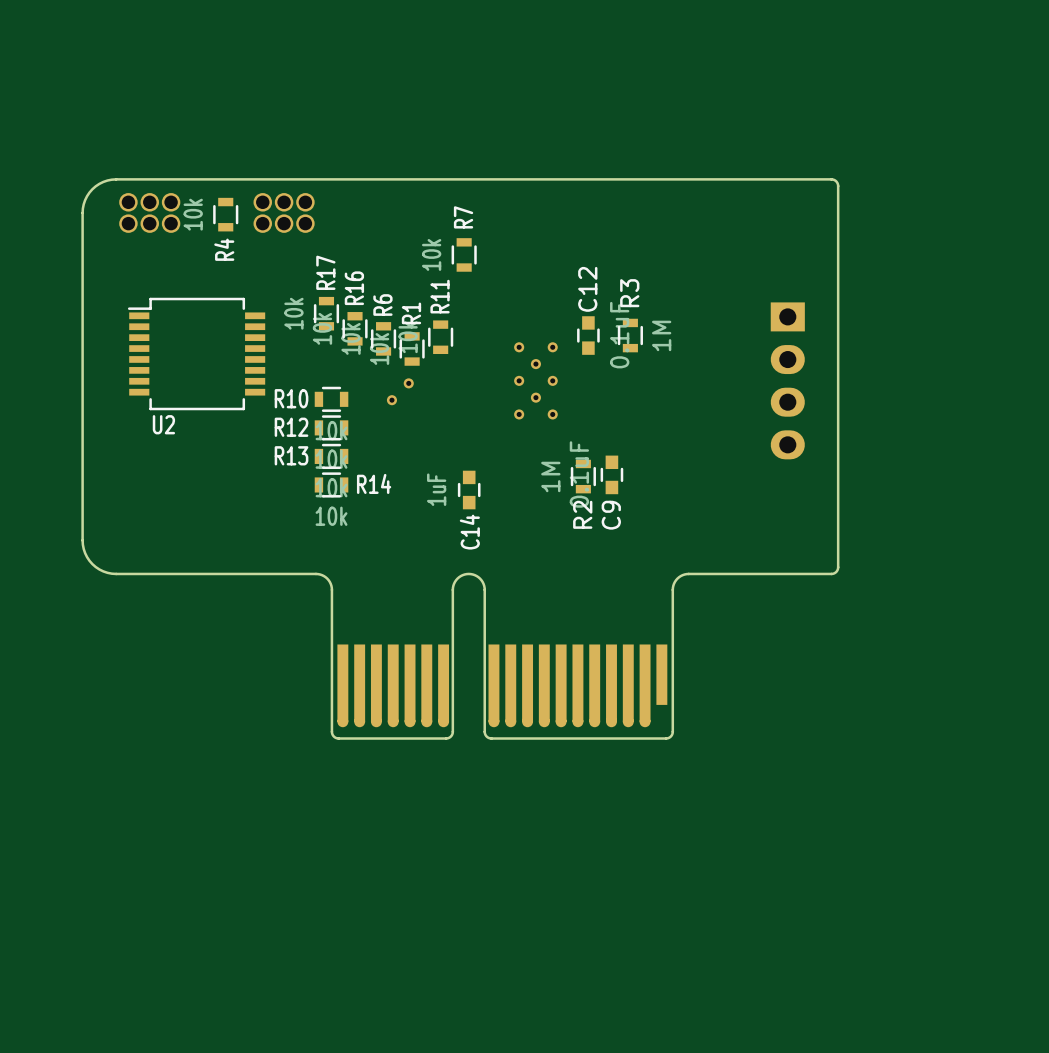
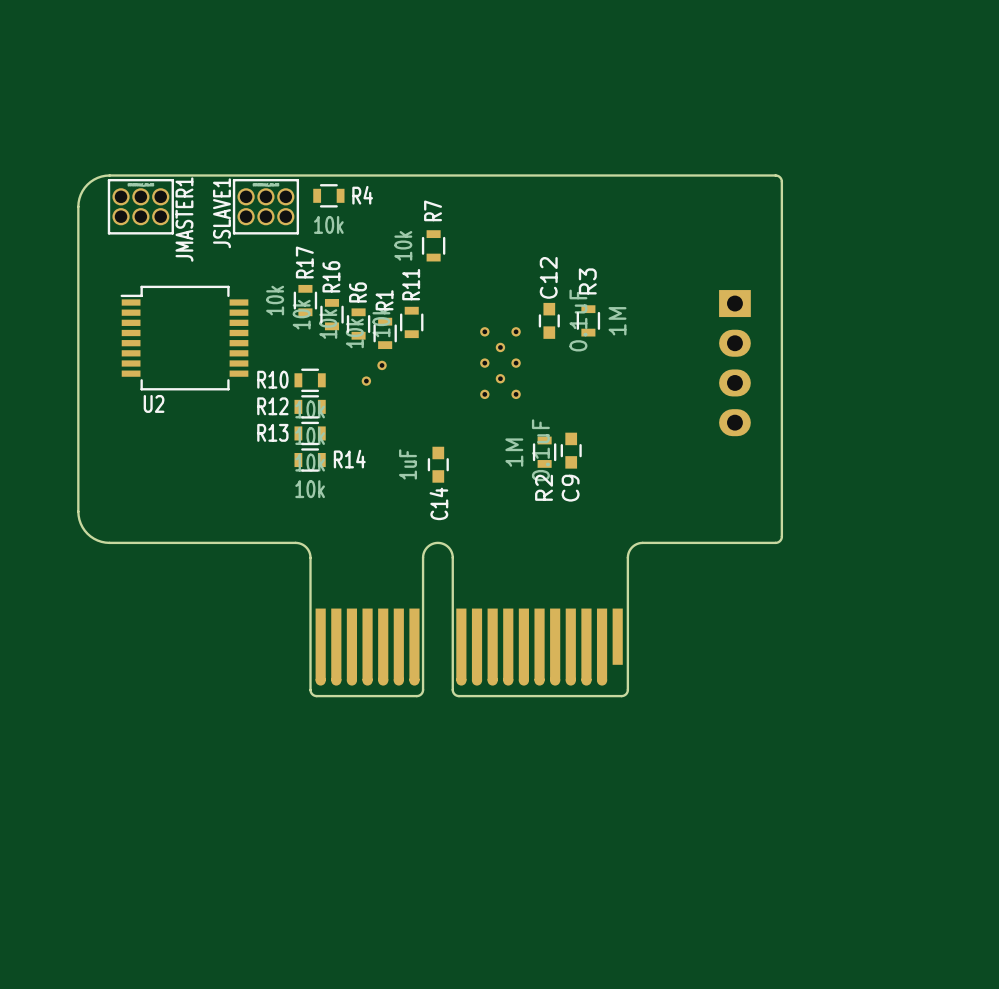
JMASTER1 side: bottom (149, 212) -> top (140, 206)
JSLAVE1 side: bottom (284, 212) -> top (265, 206)
R4 value position: 10k (193, 214) -> 10k (328, 224)
R4 rotation: 0° (225, 214) -> 90° clockwise (328, 195)
R4 position: (225, 214) -> (328, 195)
R4 name position: R4 (224, 249) -> R4 (362, 195)

